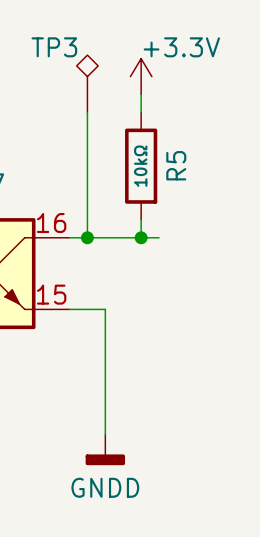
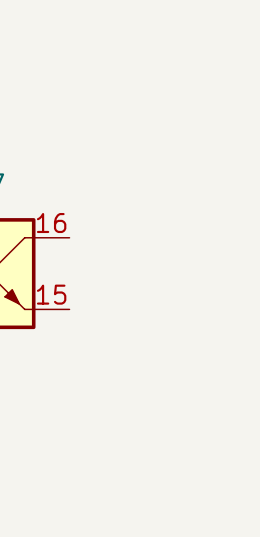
power symbol: +3.3V (141, 76) -> none
TP3: (87, 83) -> none
wire: (141, 94) (141, 112) -> none
wire: (87, 112) (87, 237) -> none
R5: 10kΩ (141, 166) -> none
wire: (141, 219) (141, 237) -> none
wire: (69, 237) (159, 237) -> none
junction: (87, 237) -> none
junction: (141, 237) -> none
wire: (69, 309) (105, 309) (105, 434) -> none
power symbol: GNDD (105, 449) -> none

